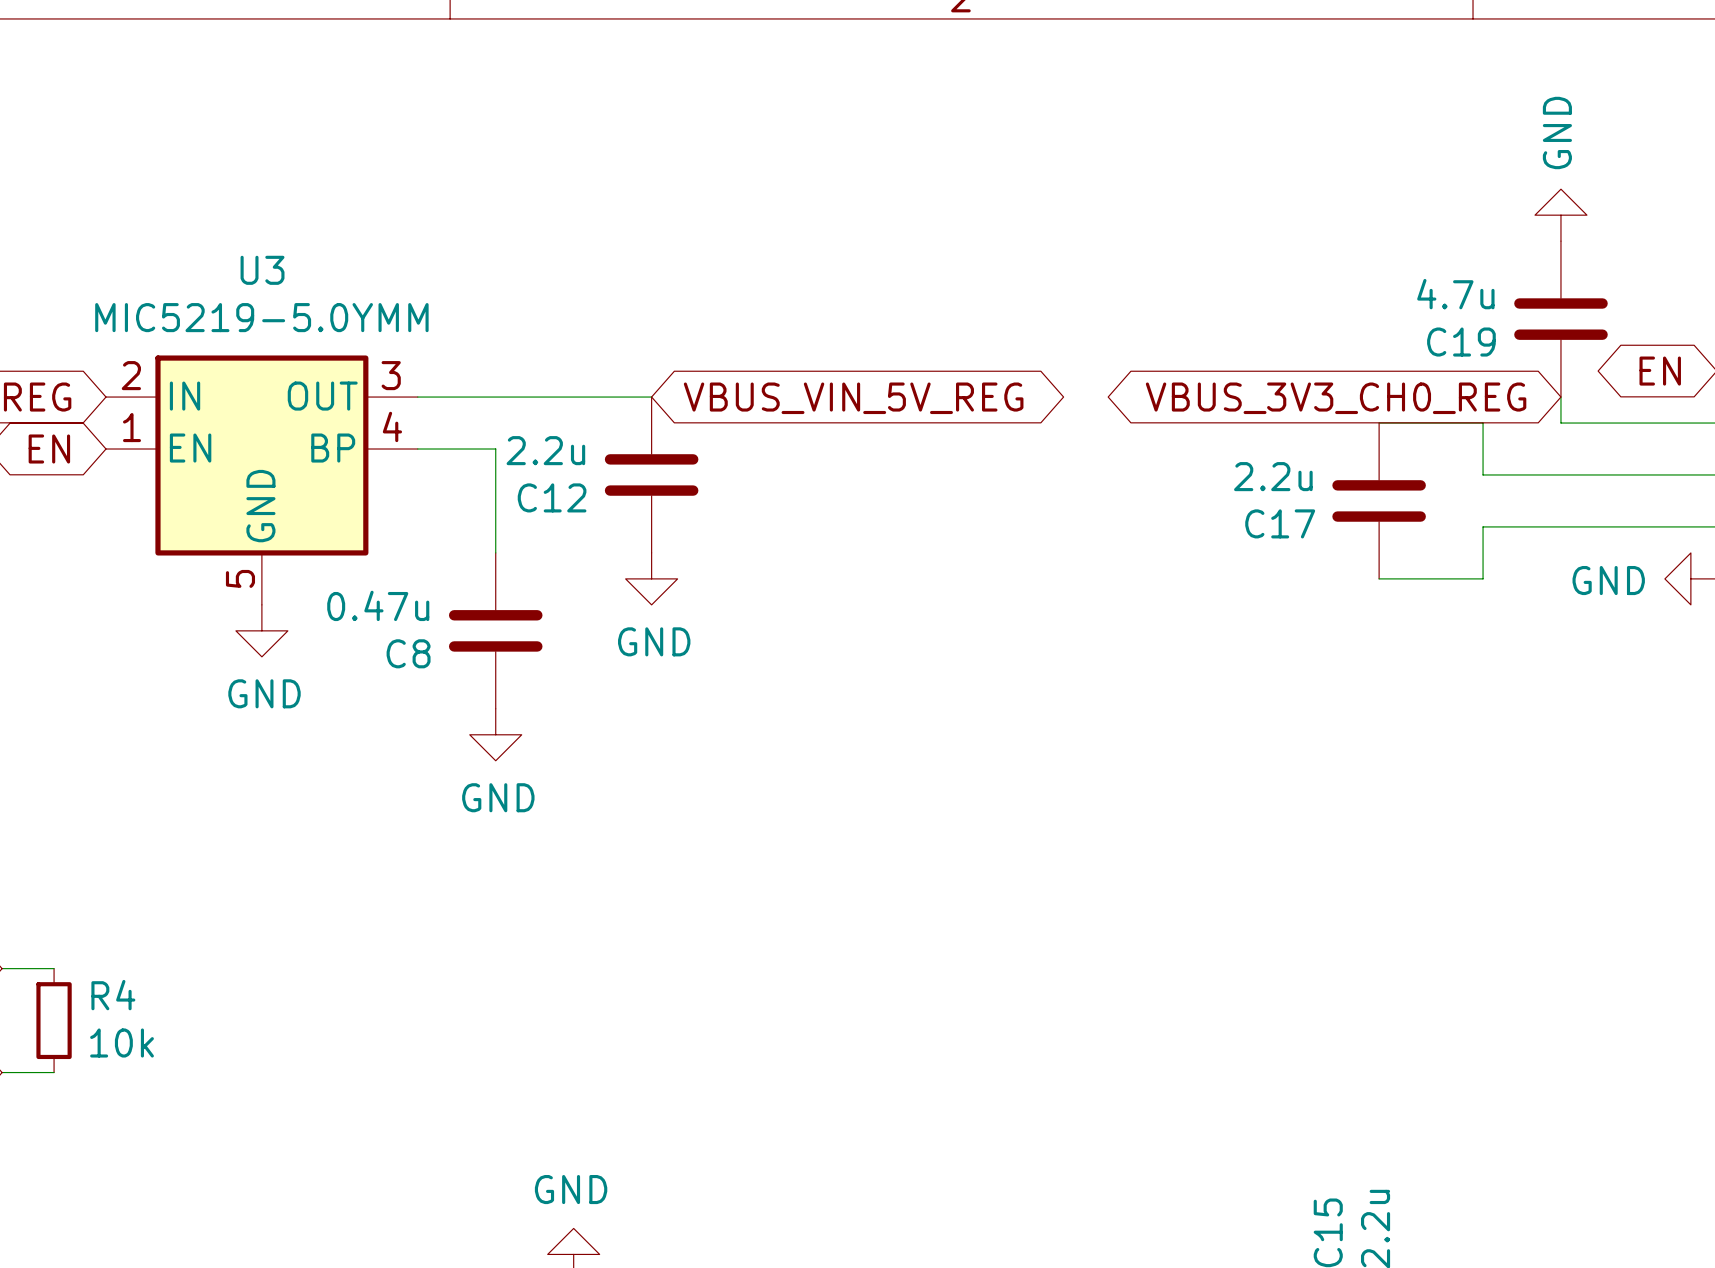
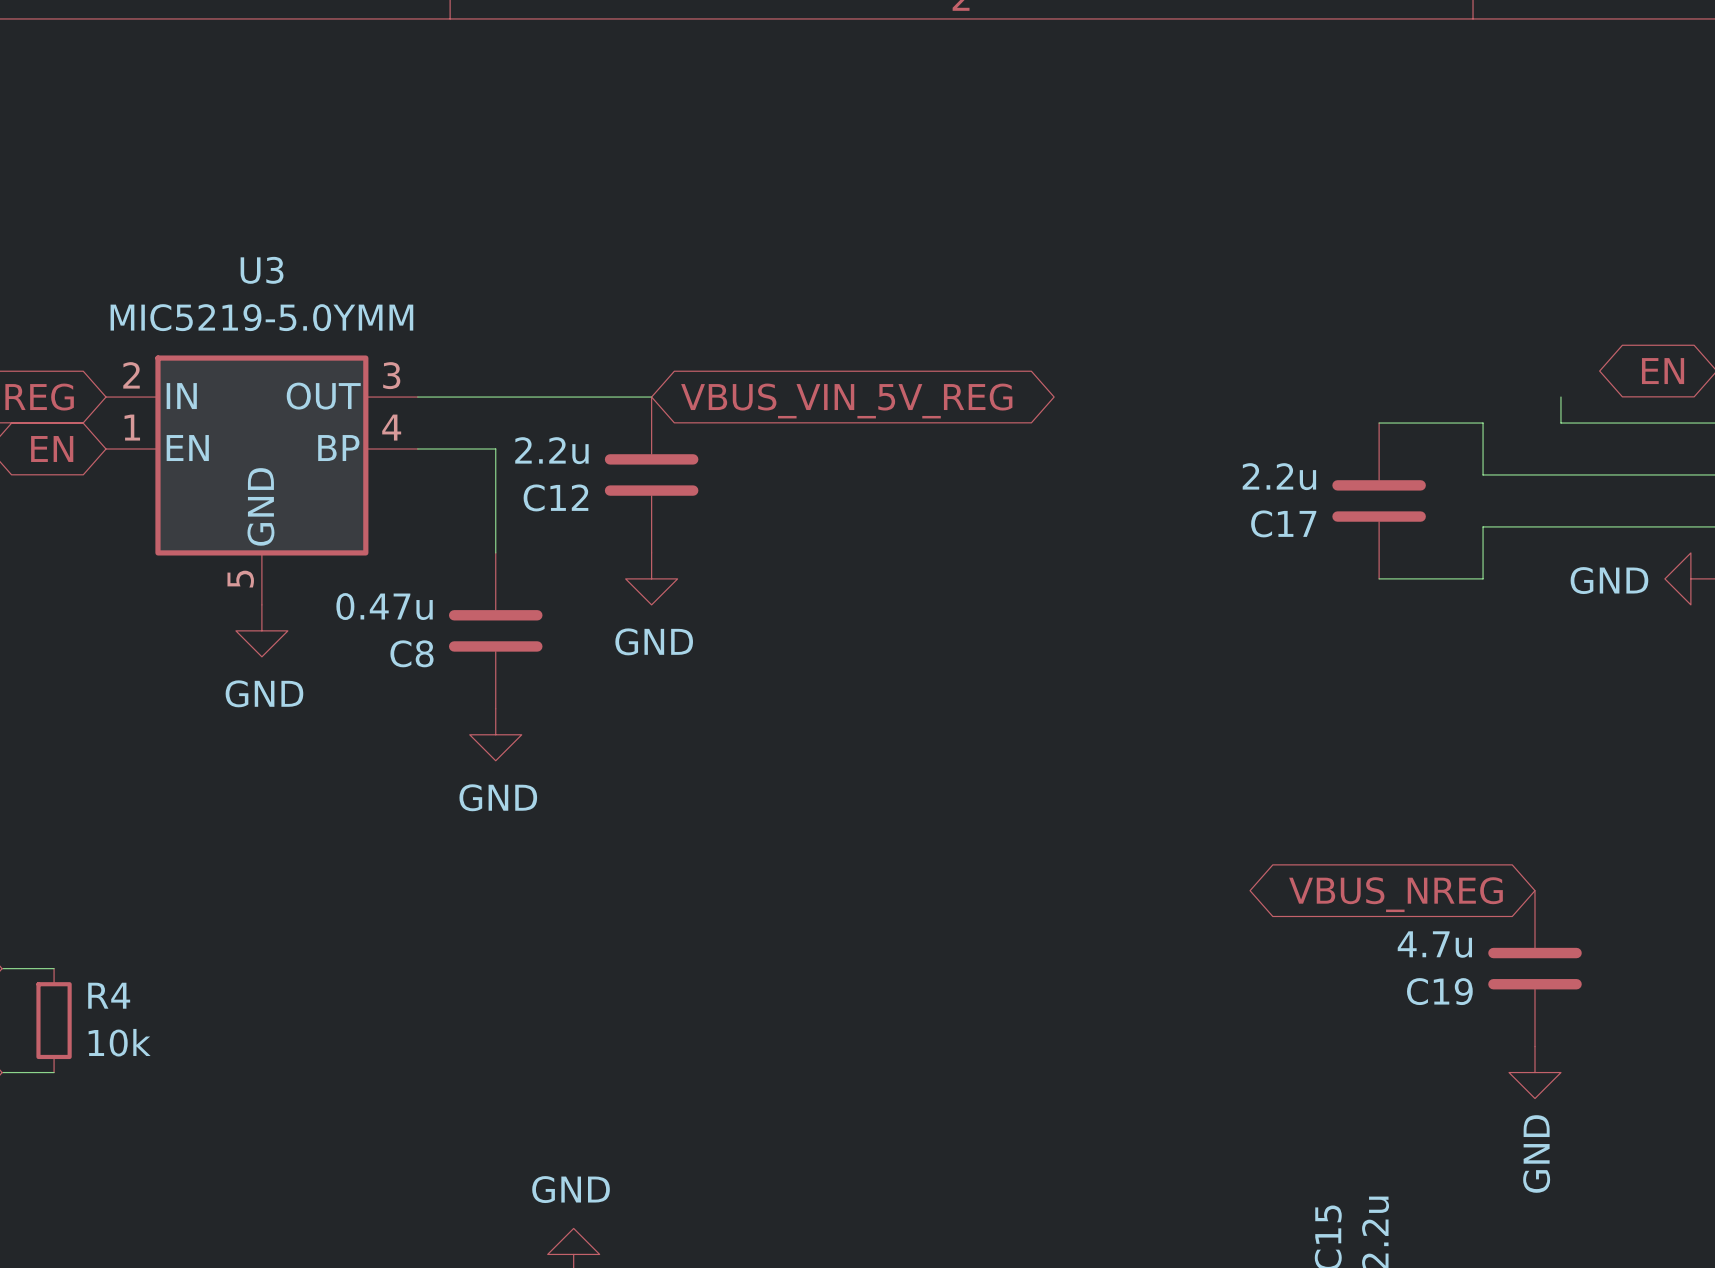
power symbol: GND (1560, 215) -> none
C19 position: (1560, 319) -> (1535, 968)
global label: VBUS_3V3_CH0_REG (1336, 398) -> none
global label: none -> VBUS_NREG (1395, 894)
power symbol: none -> GND (1535, 1072)

